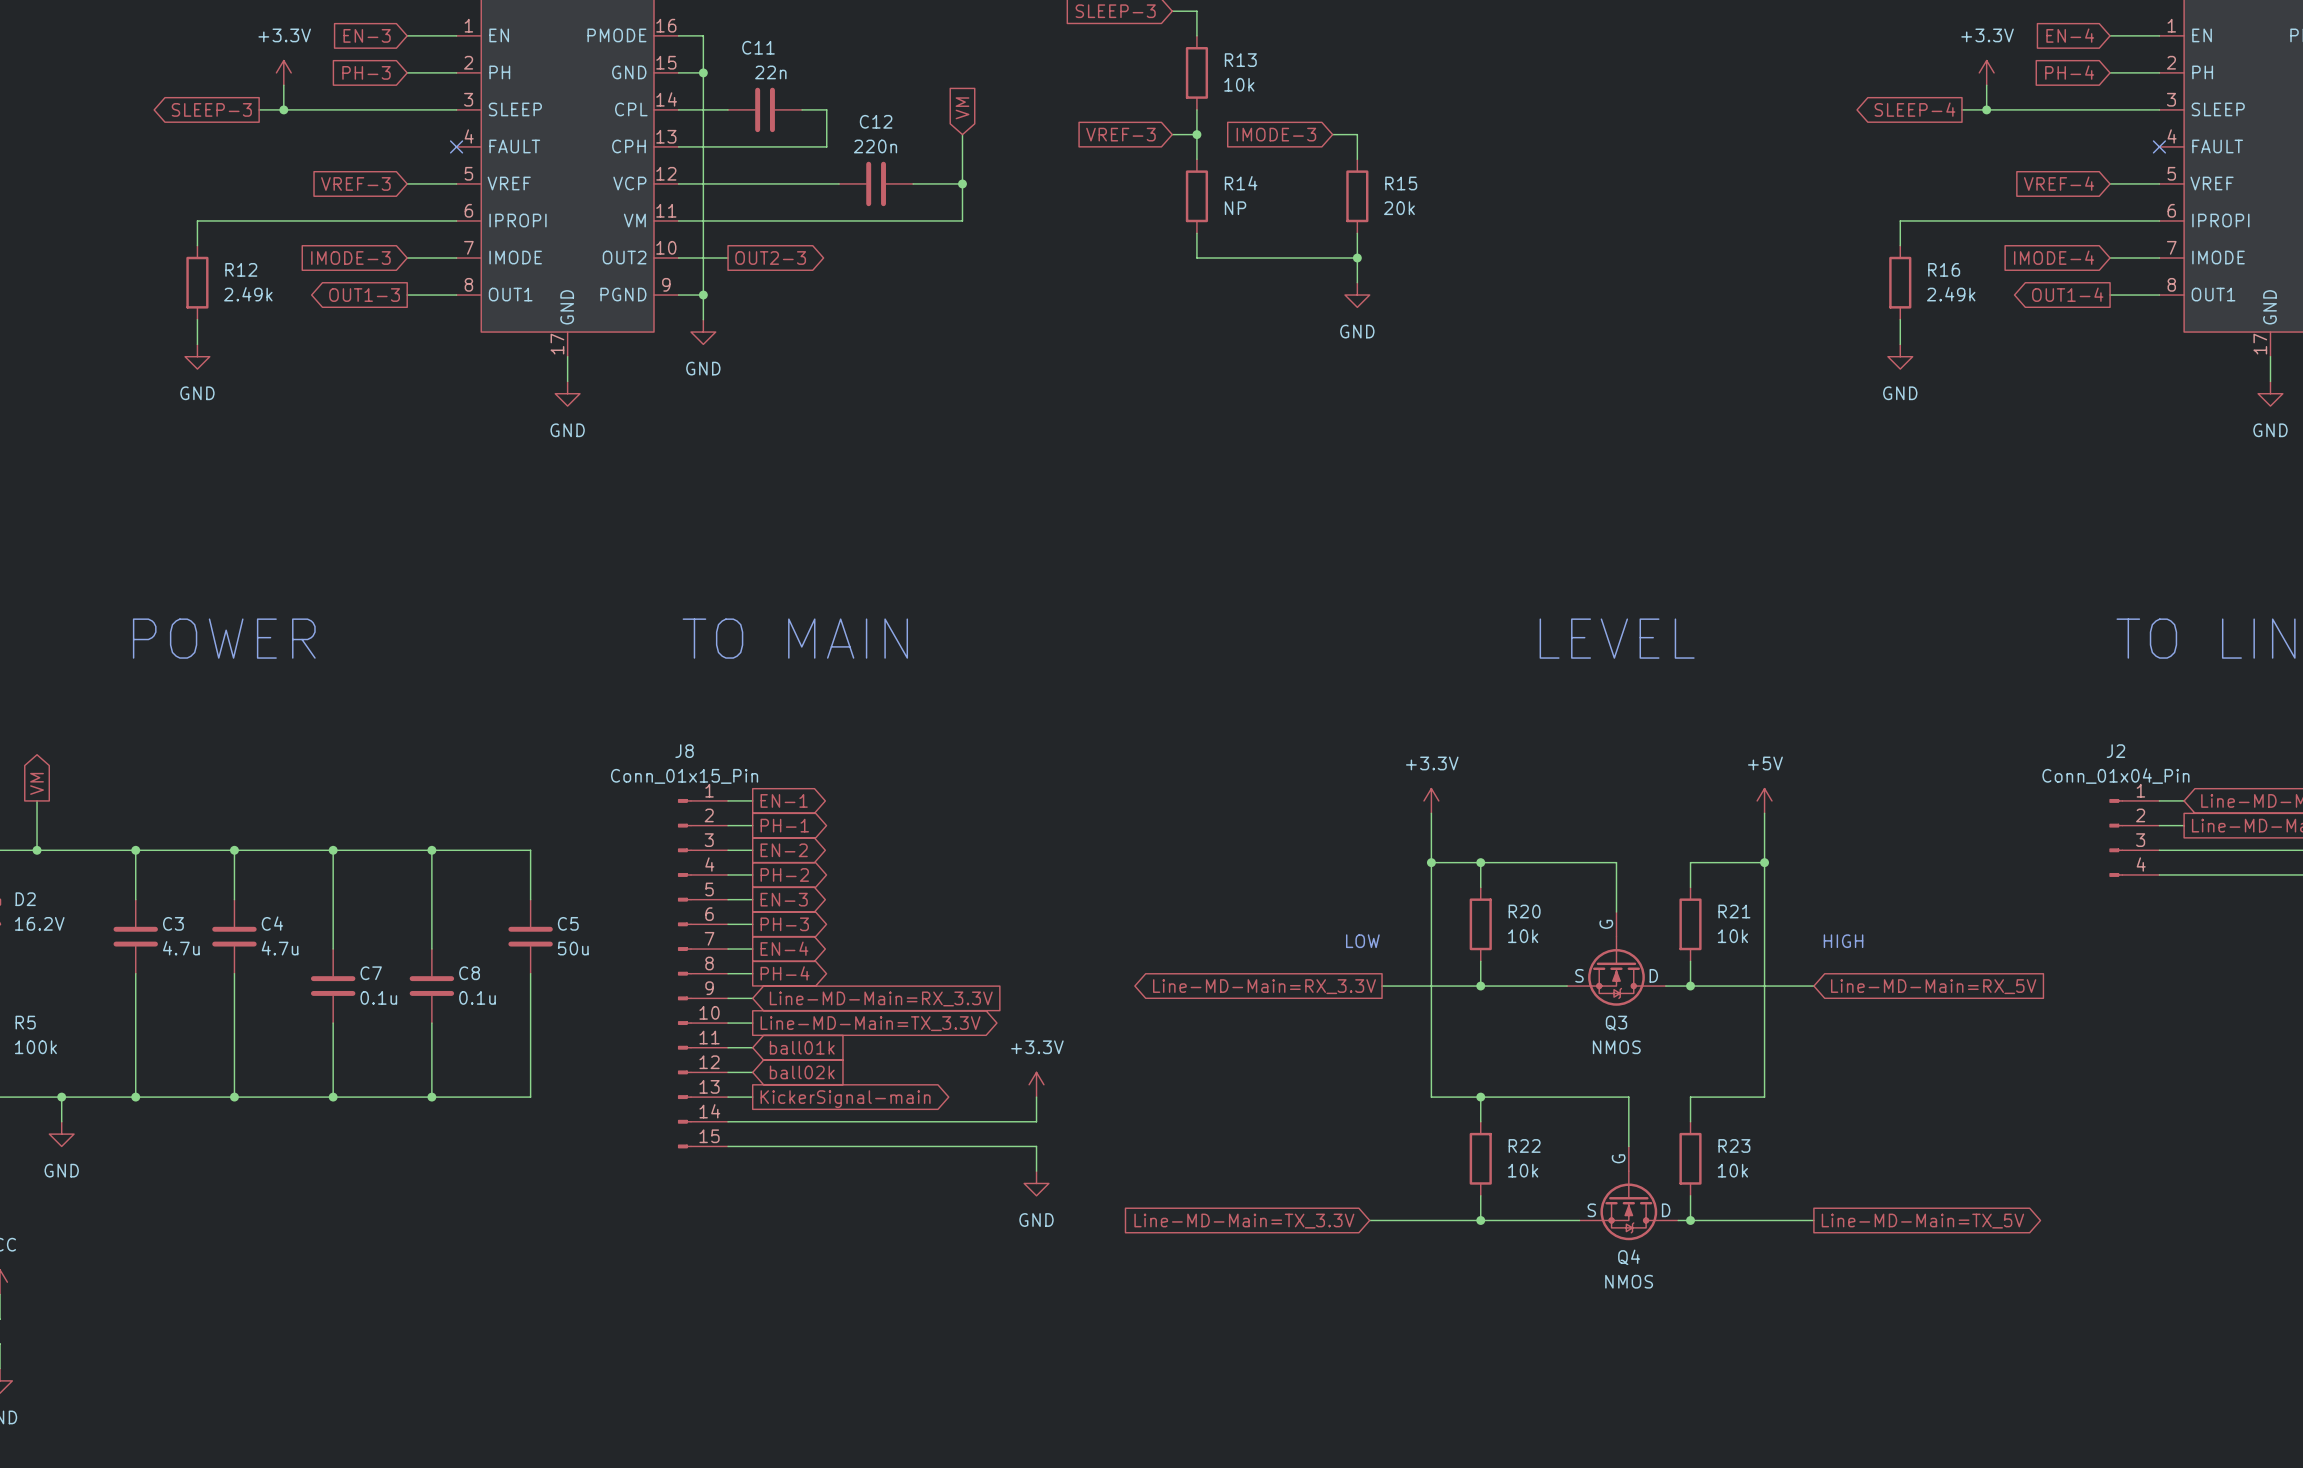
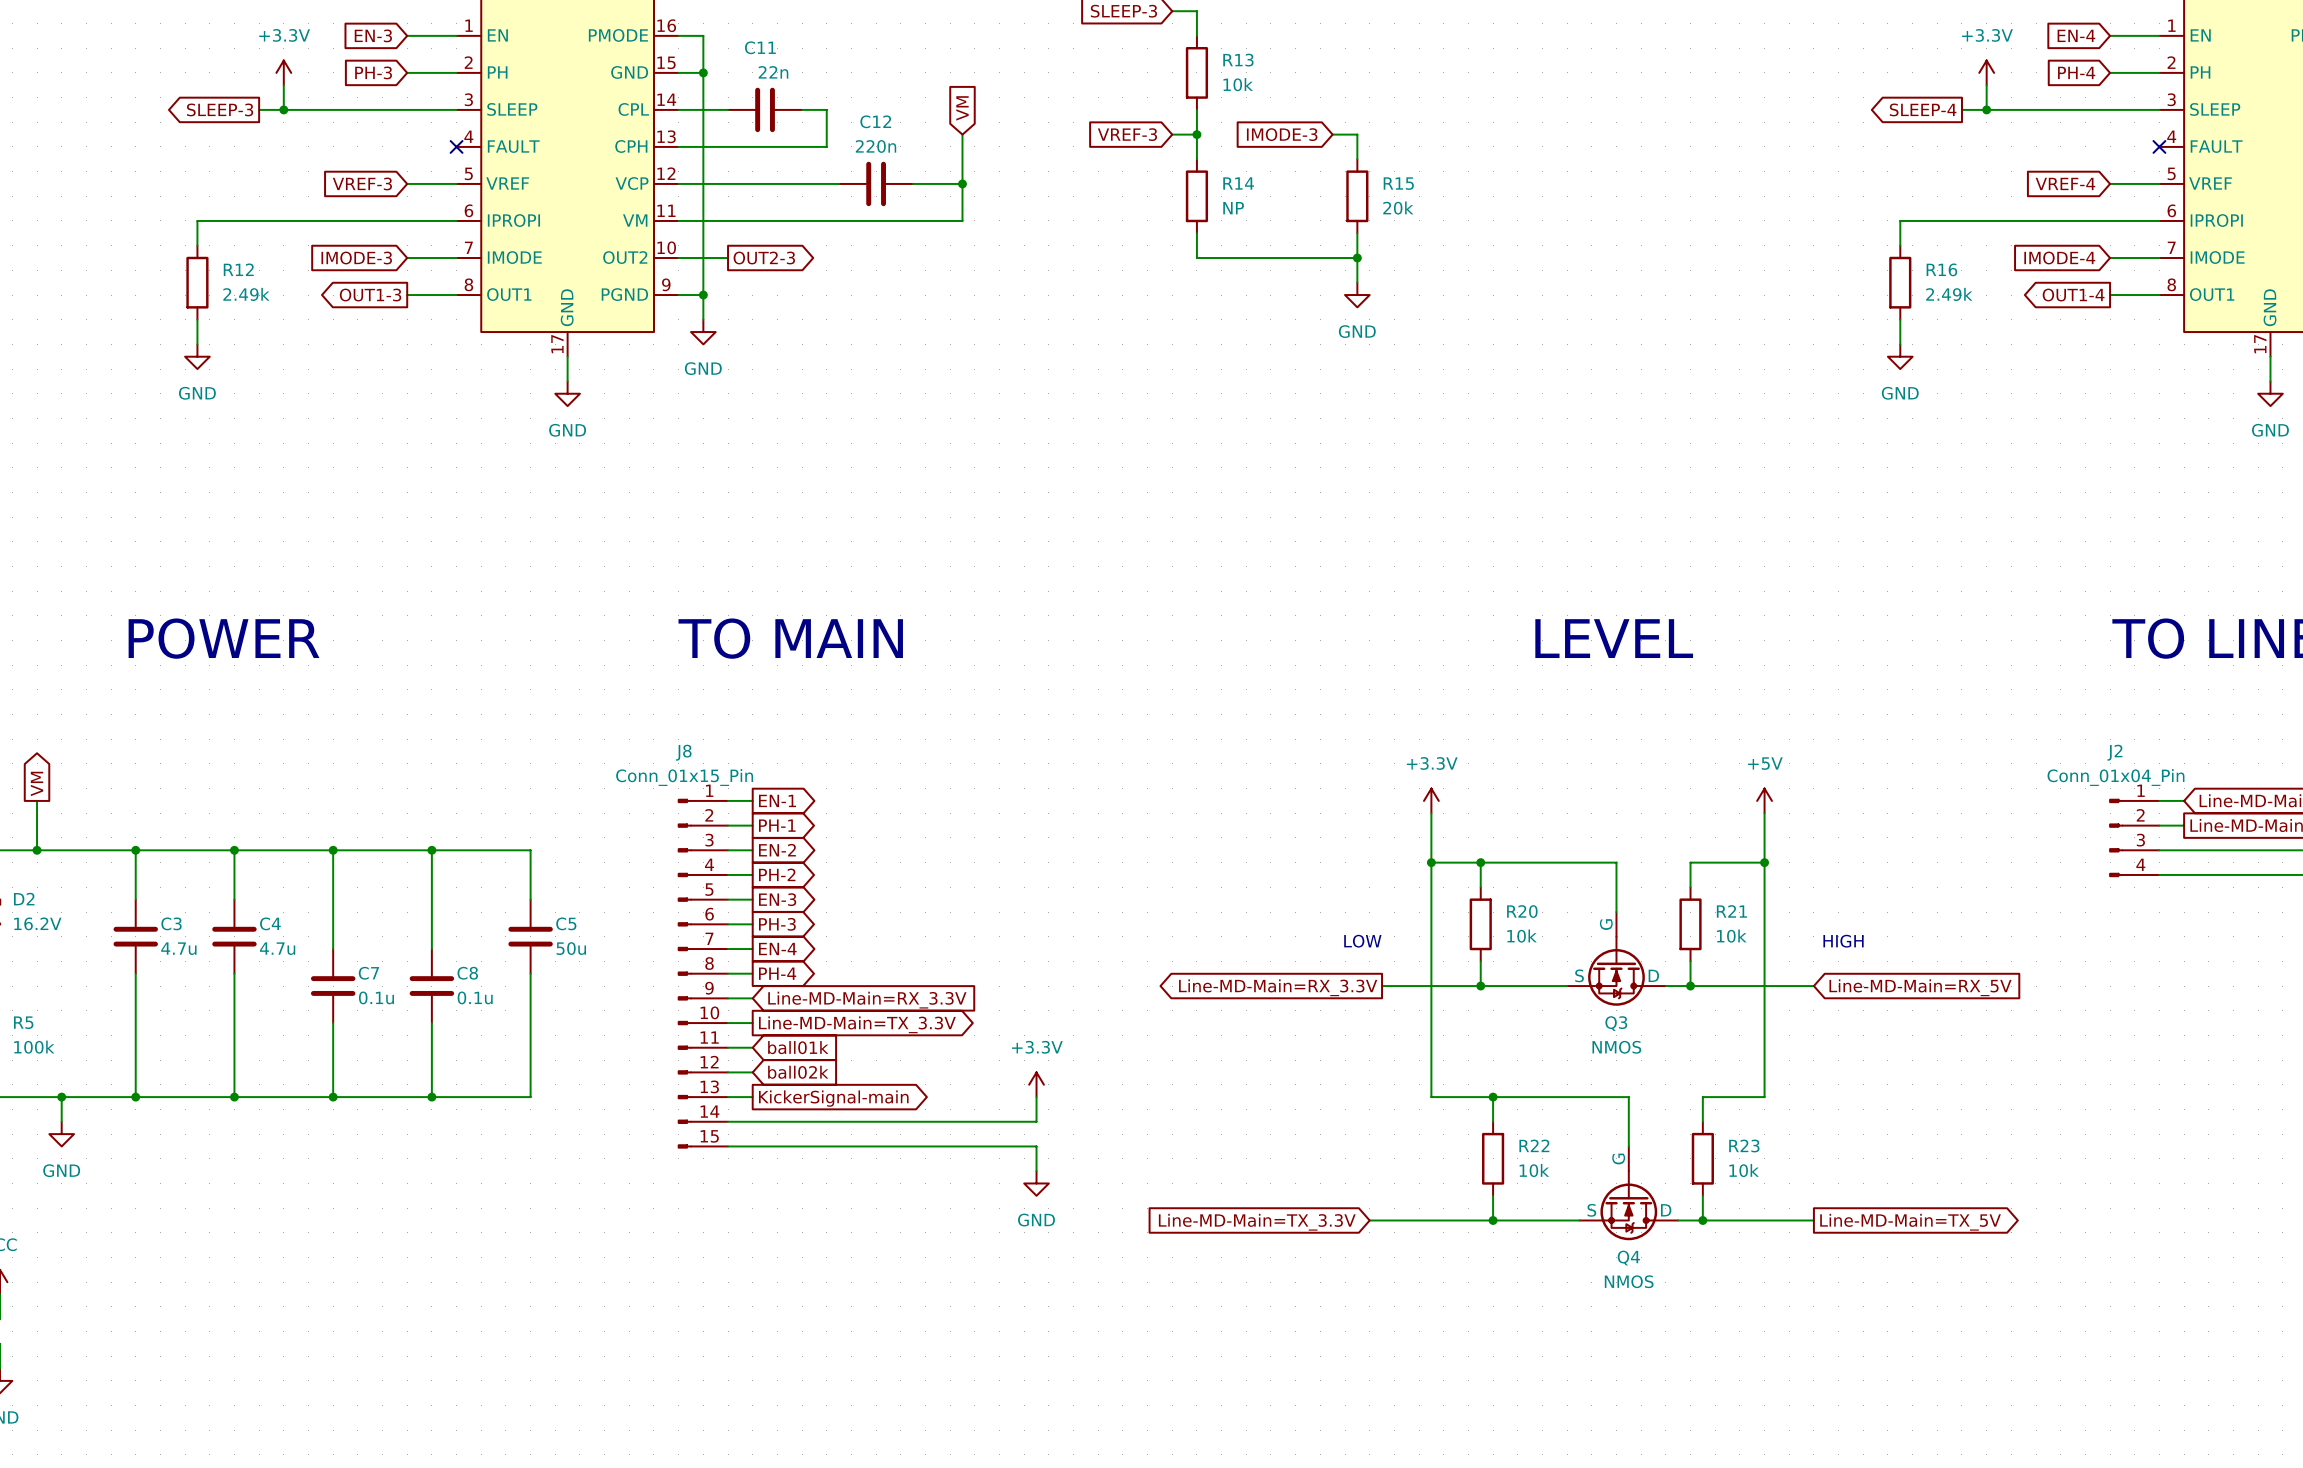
wire: (1480, 1097) (1480, 1121) -> (1493, 1097) (1493, 1121)
junction position: (1480, 1097) -> (1493, 1097)
wire: (1702, 1097) (1690, 1097) (1690, 1121) -> (1702, 1097) (1702, 1121)
R22 position: (1480, 1158) -> (1493, 1158)
R23 position: (1690, 1158) -> (1702, 1158)
wire: (1480, 1195) (1480, 1220) -> (1493, 1195) (1493, 1220)
wire: (1690, 1195) (1690, 1220) -> (1702, 1195) (1702, 1220)
junction position: (1480, 1220) -> (1493, 1220)
junction position: (1690, 1220) -> (1702, 1220)

